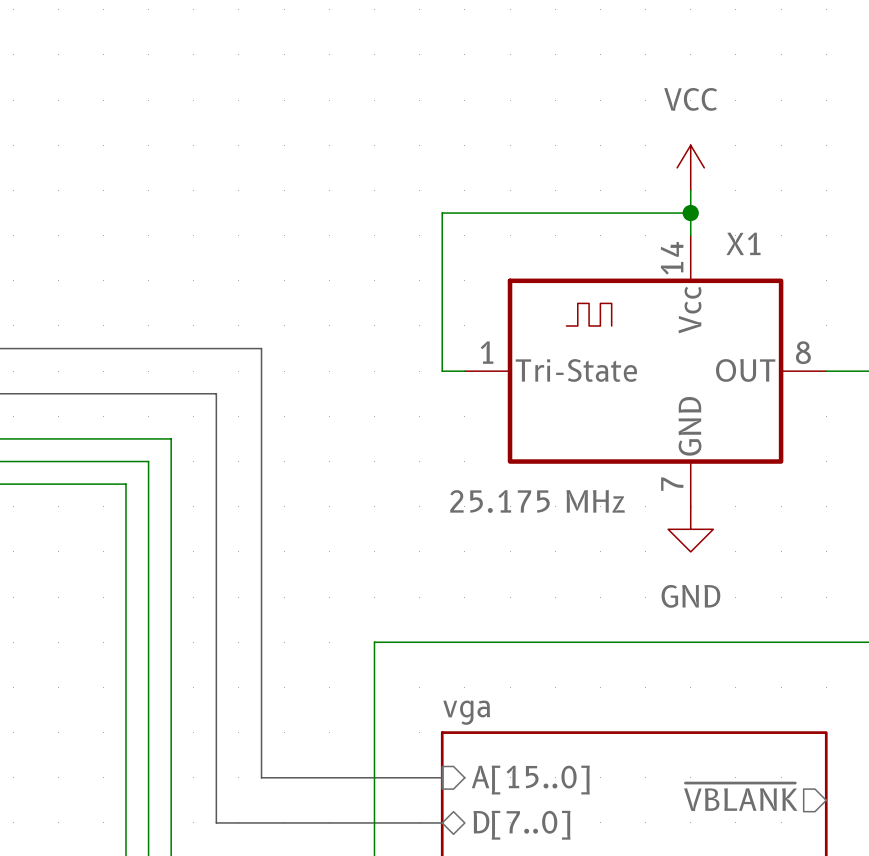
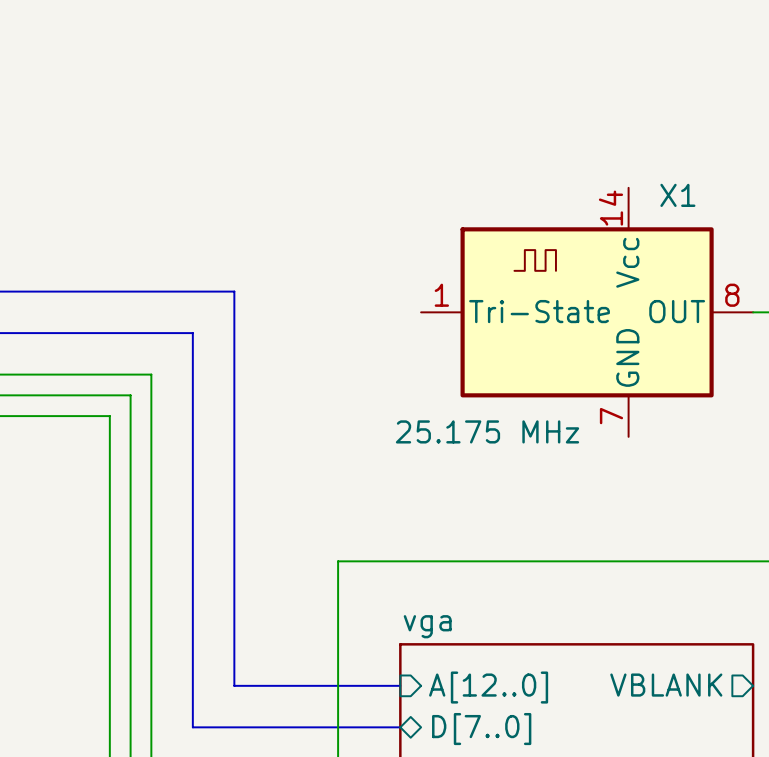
power symbol: VCC (690, 167) -> none
wire: (690, 190) (690, 235) -> none
wire: (690, 213) (442, 213) (442, 371) (464, 371) -> none
junction: (690, 213) -> none
power symbol: GND (690, 529) -> none
sheet pin: A[15..0] (530, 780) -> A[12..0] (488, 687)
sheet pin: ~{VBLANK} (740, 797) -> VBLANK (666, 685)

